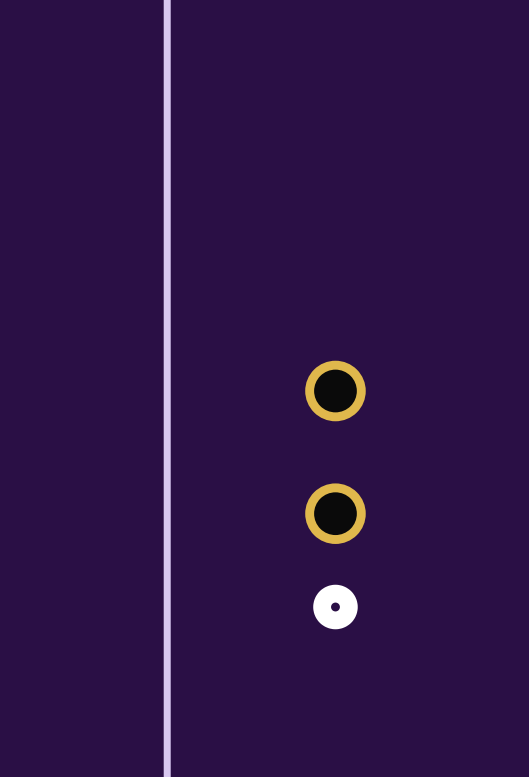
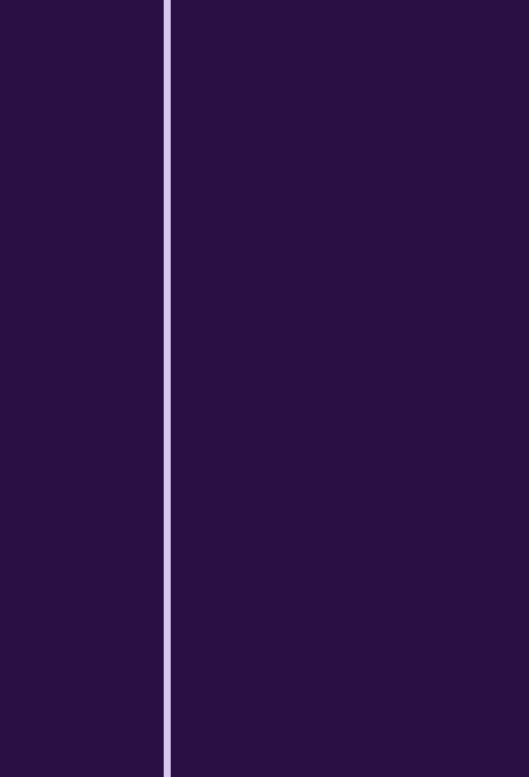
part: (335, 494) -> none

